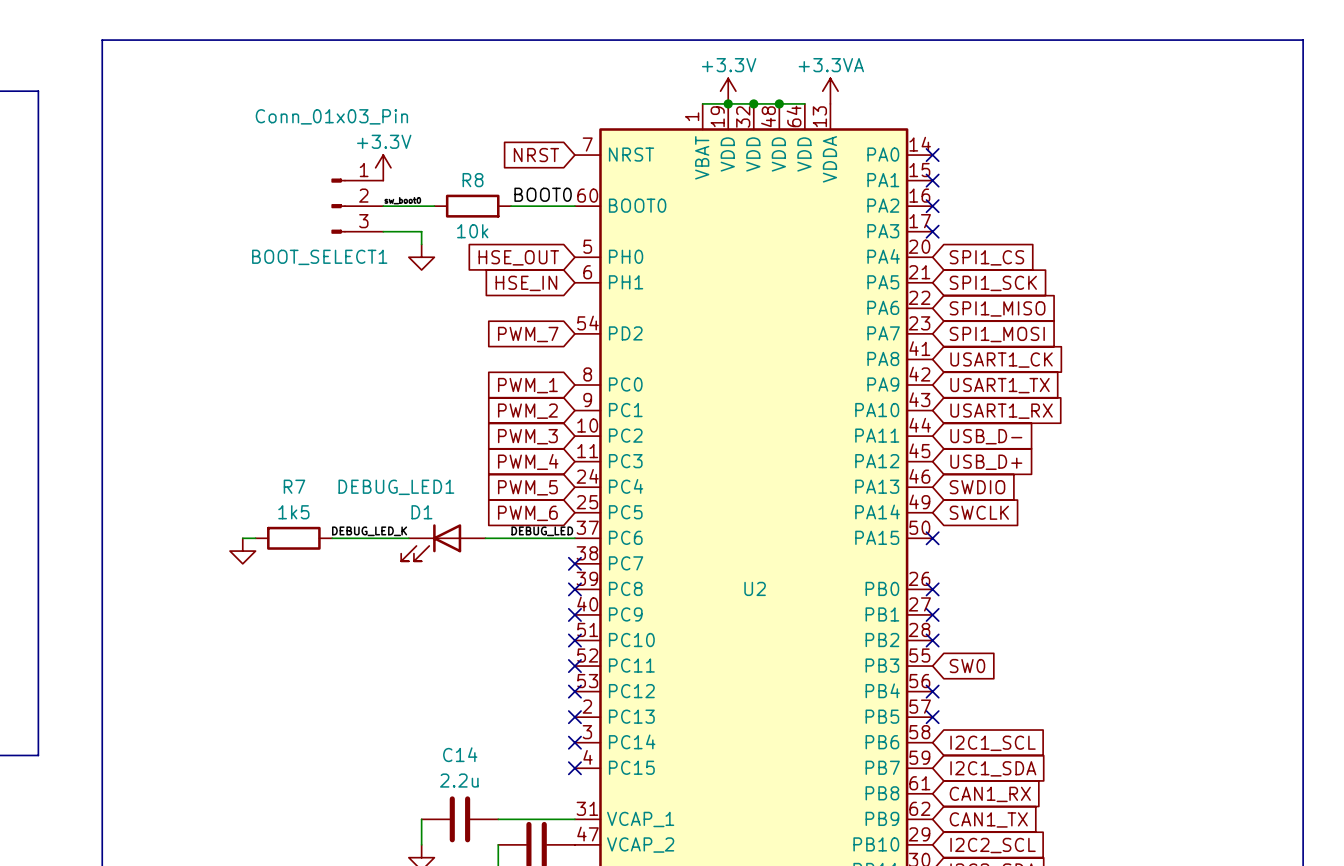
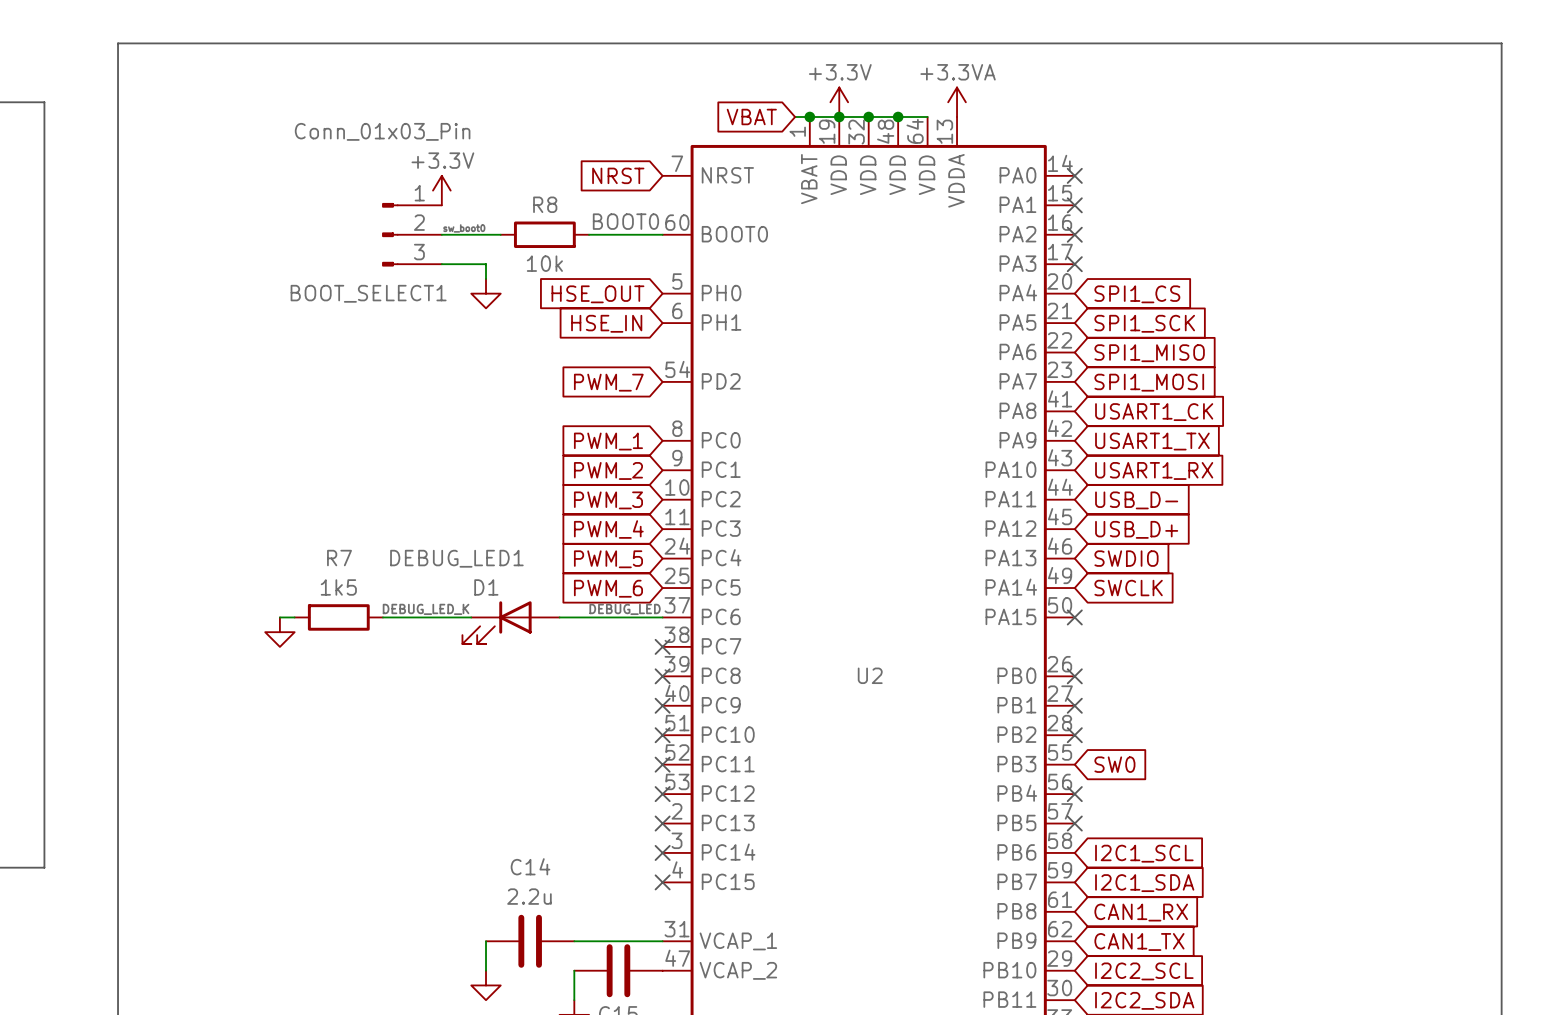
global label: none -> VBAT (751, 117)
wire: none -> (795, 117) (809, 117)
junction: none -> (809, 117)

